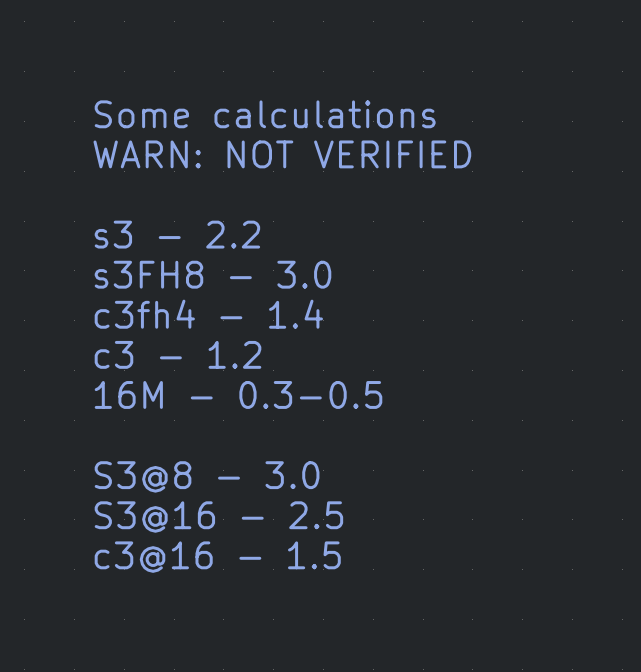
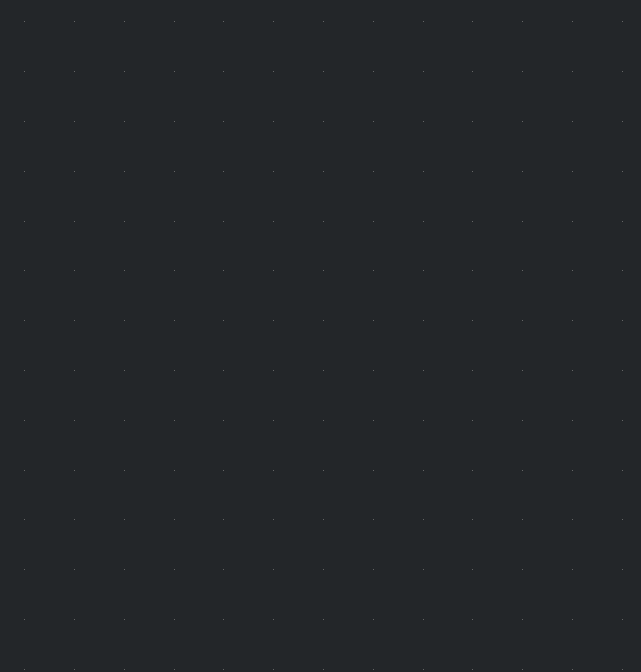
text: Some calculations (265, 114) -> none
text: WARN: NOT VERIFIED (282, 154) -> none
text: s3 - 2.2 (177, 234) -> none
text: s3FH8 - 3.0 (212, 274) -> none
text: c3fh4 - 1.4 (208, 314) -> none
text: c3 - 1.2 (178, 354) -> none
text: 16M - 0.3-0.5 (238, 394) -> none
text: S3@8 - 3.0 (207, 476) -> none
text: S3@16 - 2.5 (218, 517) -> none
text: c3@16 - 1.5 (217, 557) -> none

